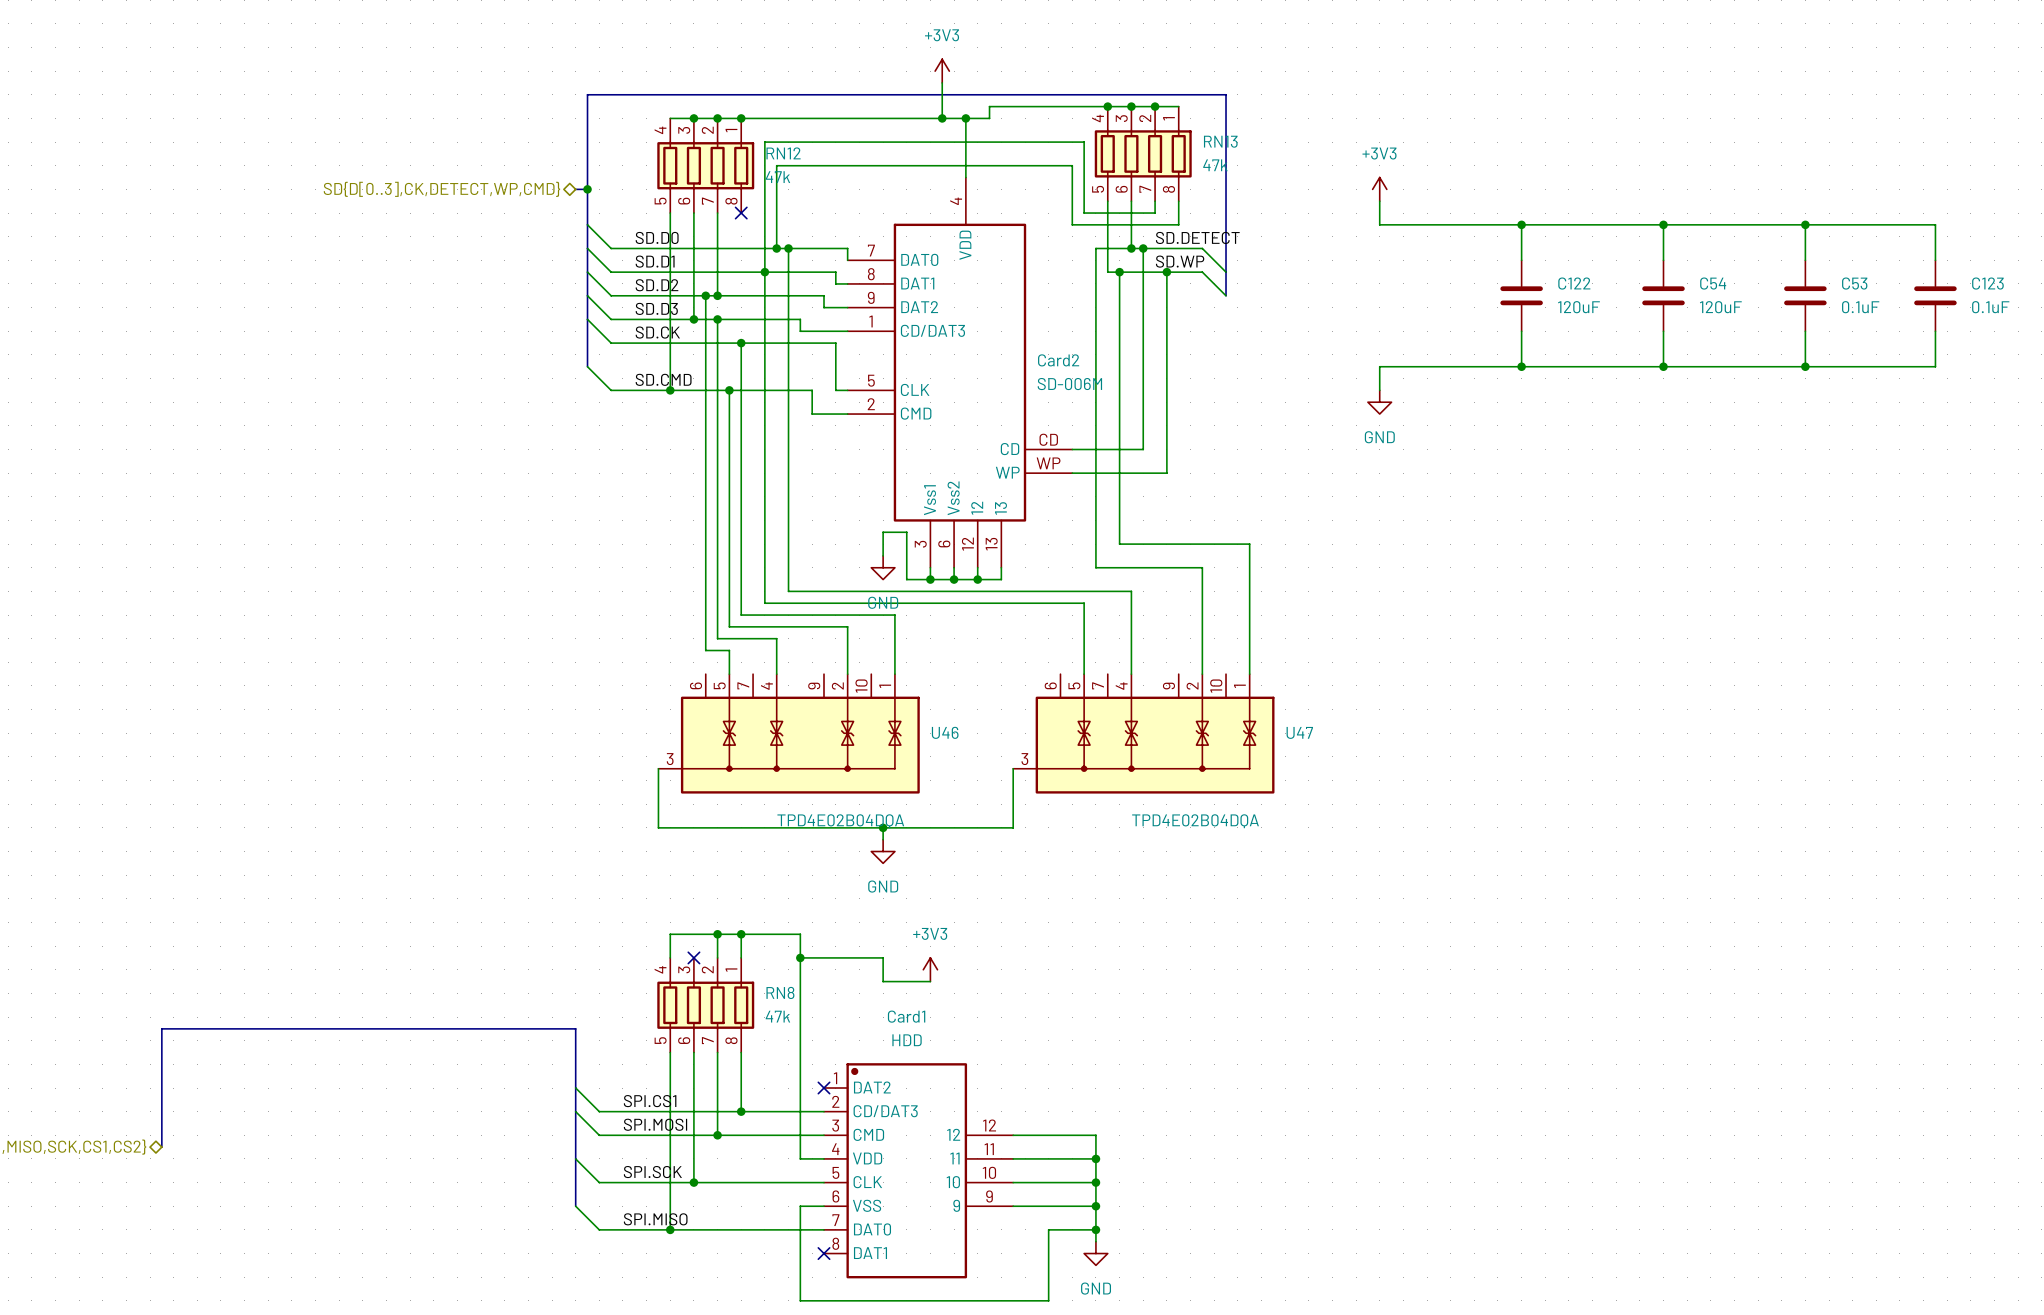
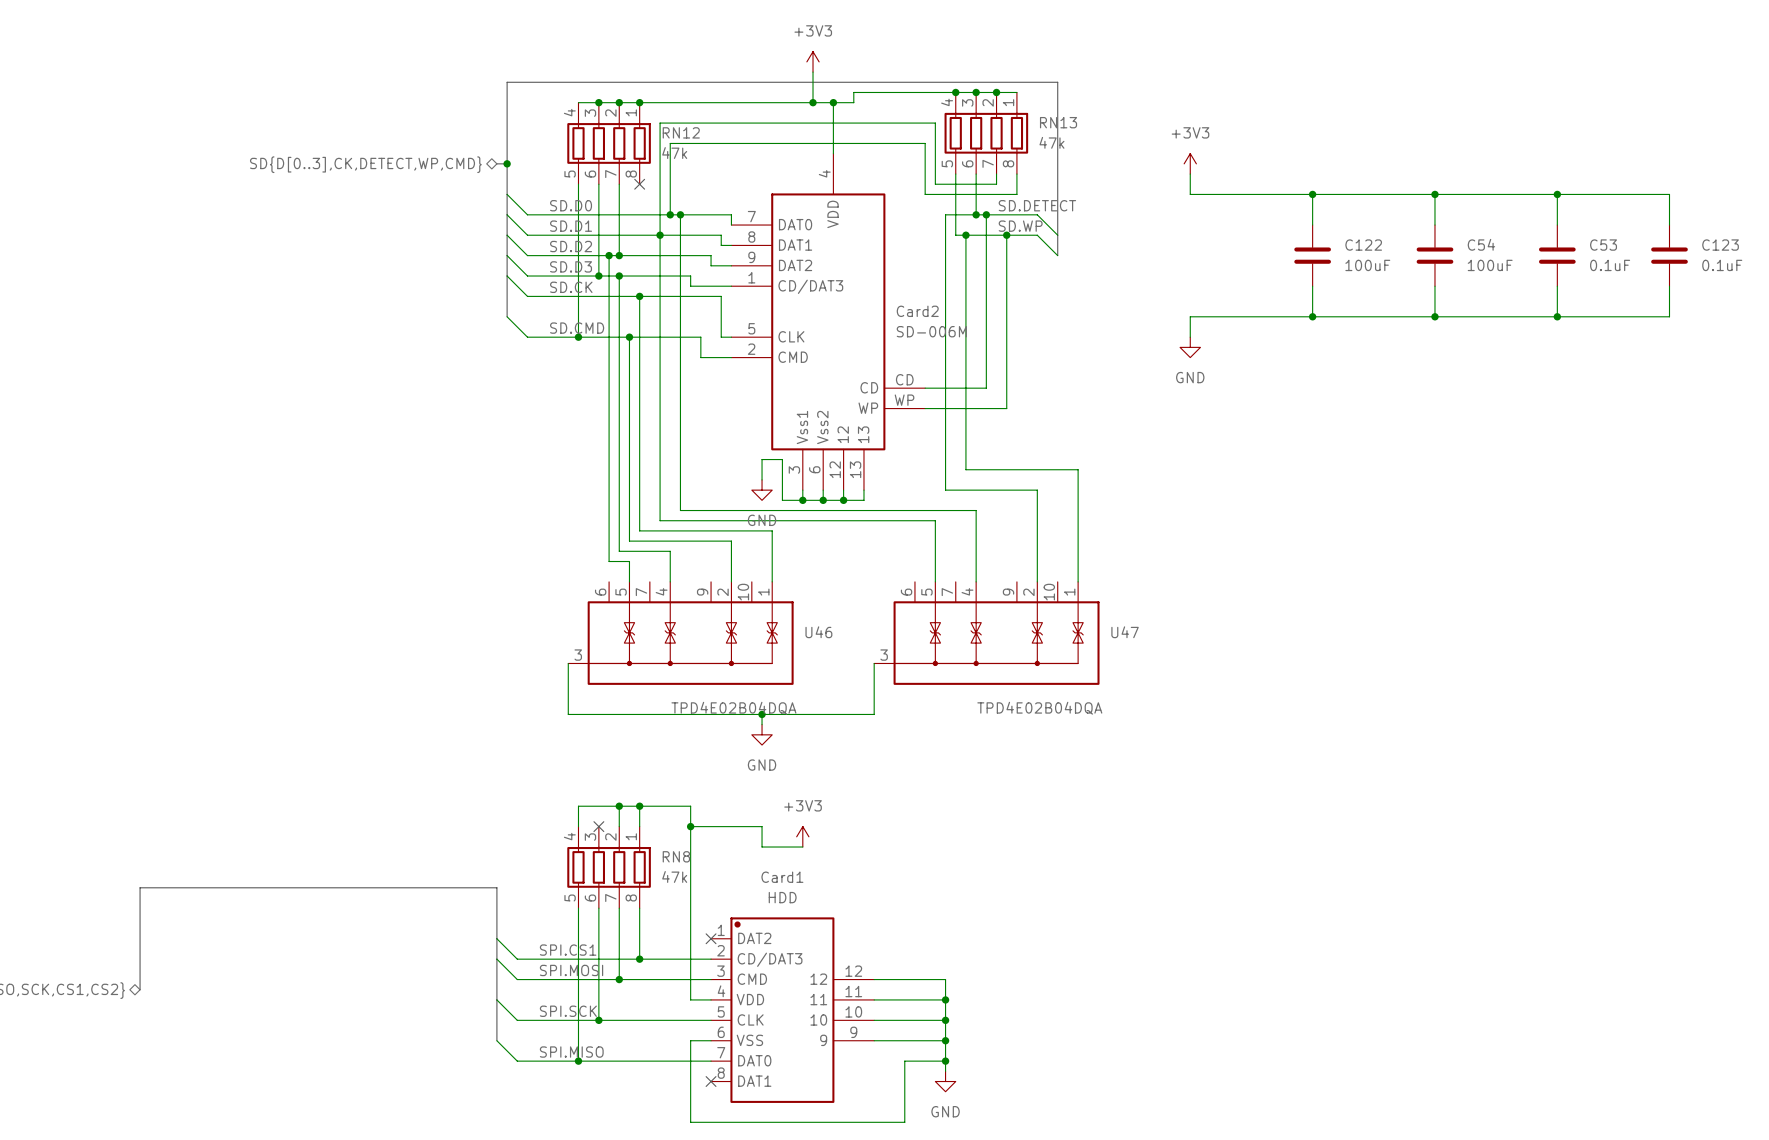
C122 value: 120uF (1578, 307) -> 100uF (1367, 265)
C54 value: 120uF (1720, 307) -> 100uF (1490, 265)

